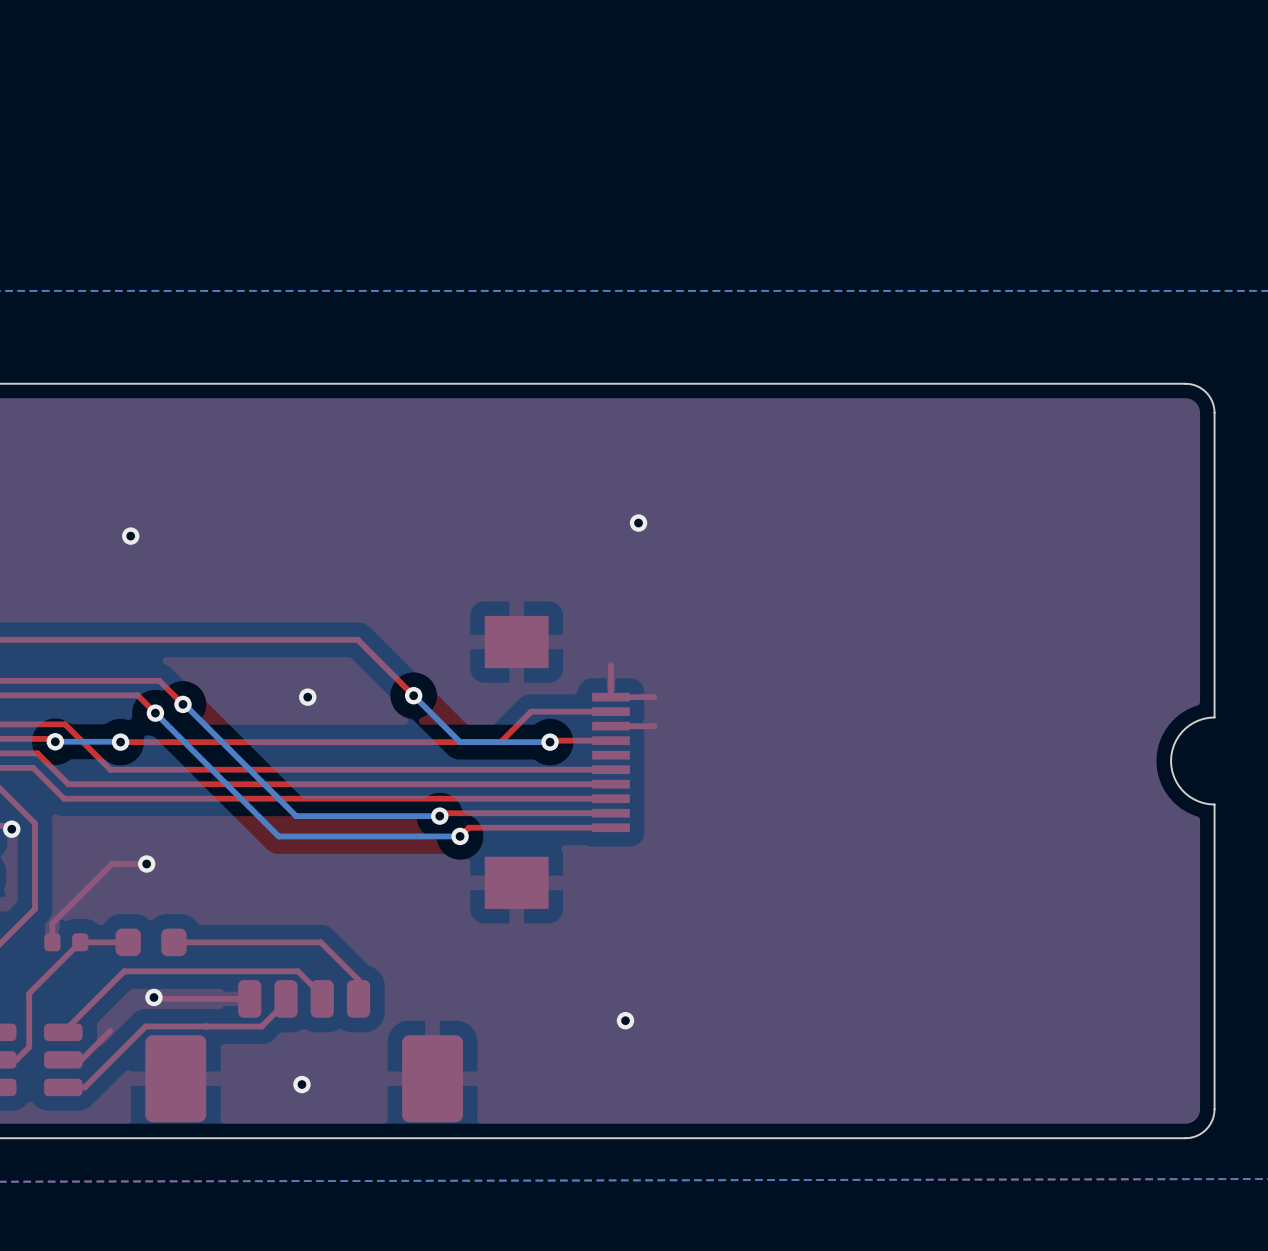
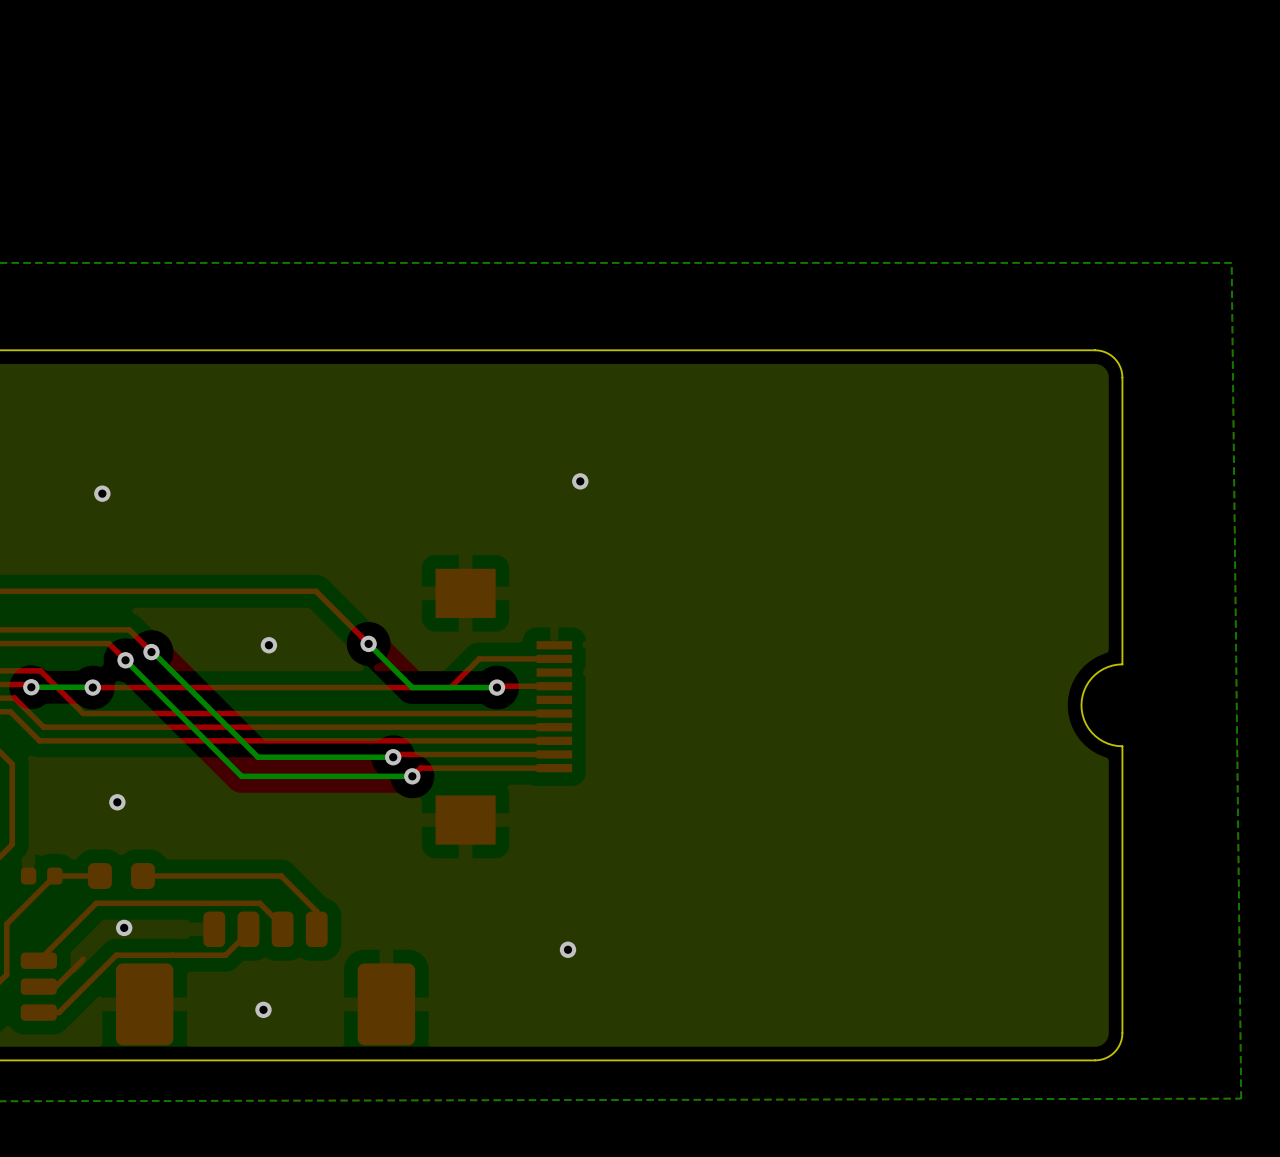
top track: (610, 665) (610, 697) (654, 697) -> none
top track: (654, 726) (610, 726) -> none
top track: (146, 864) (111, 864) (52, 923) (52, 942) -> none
top track: (153, 997) (249, 998) -> none

